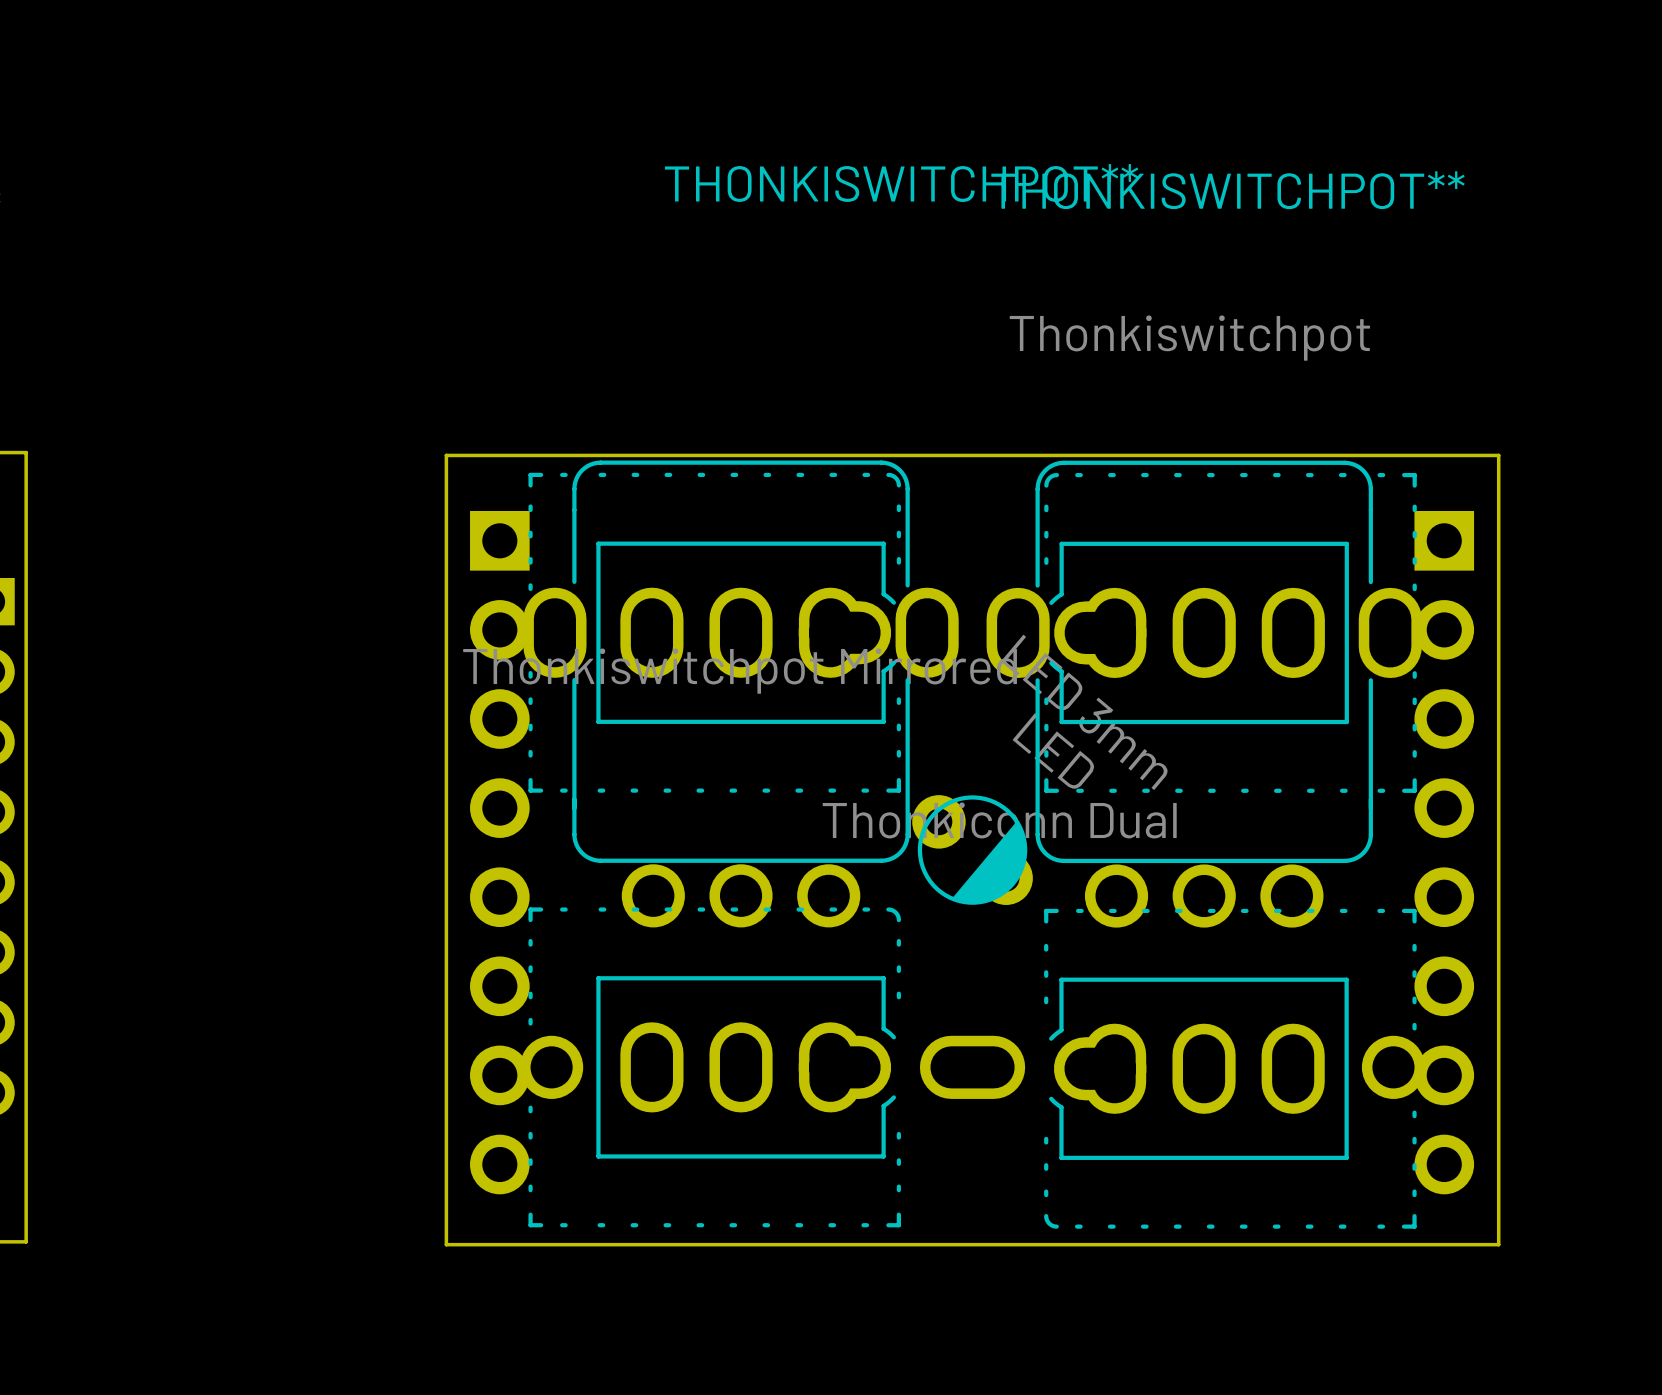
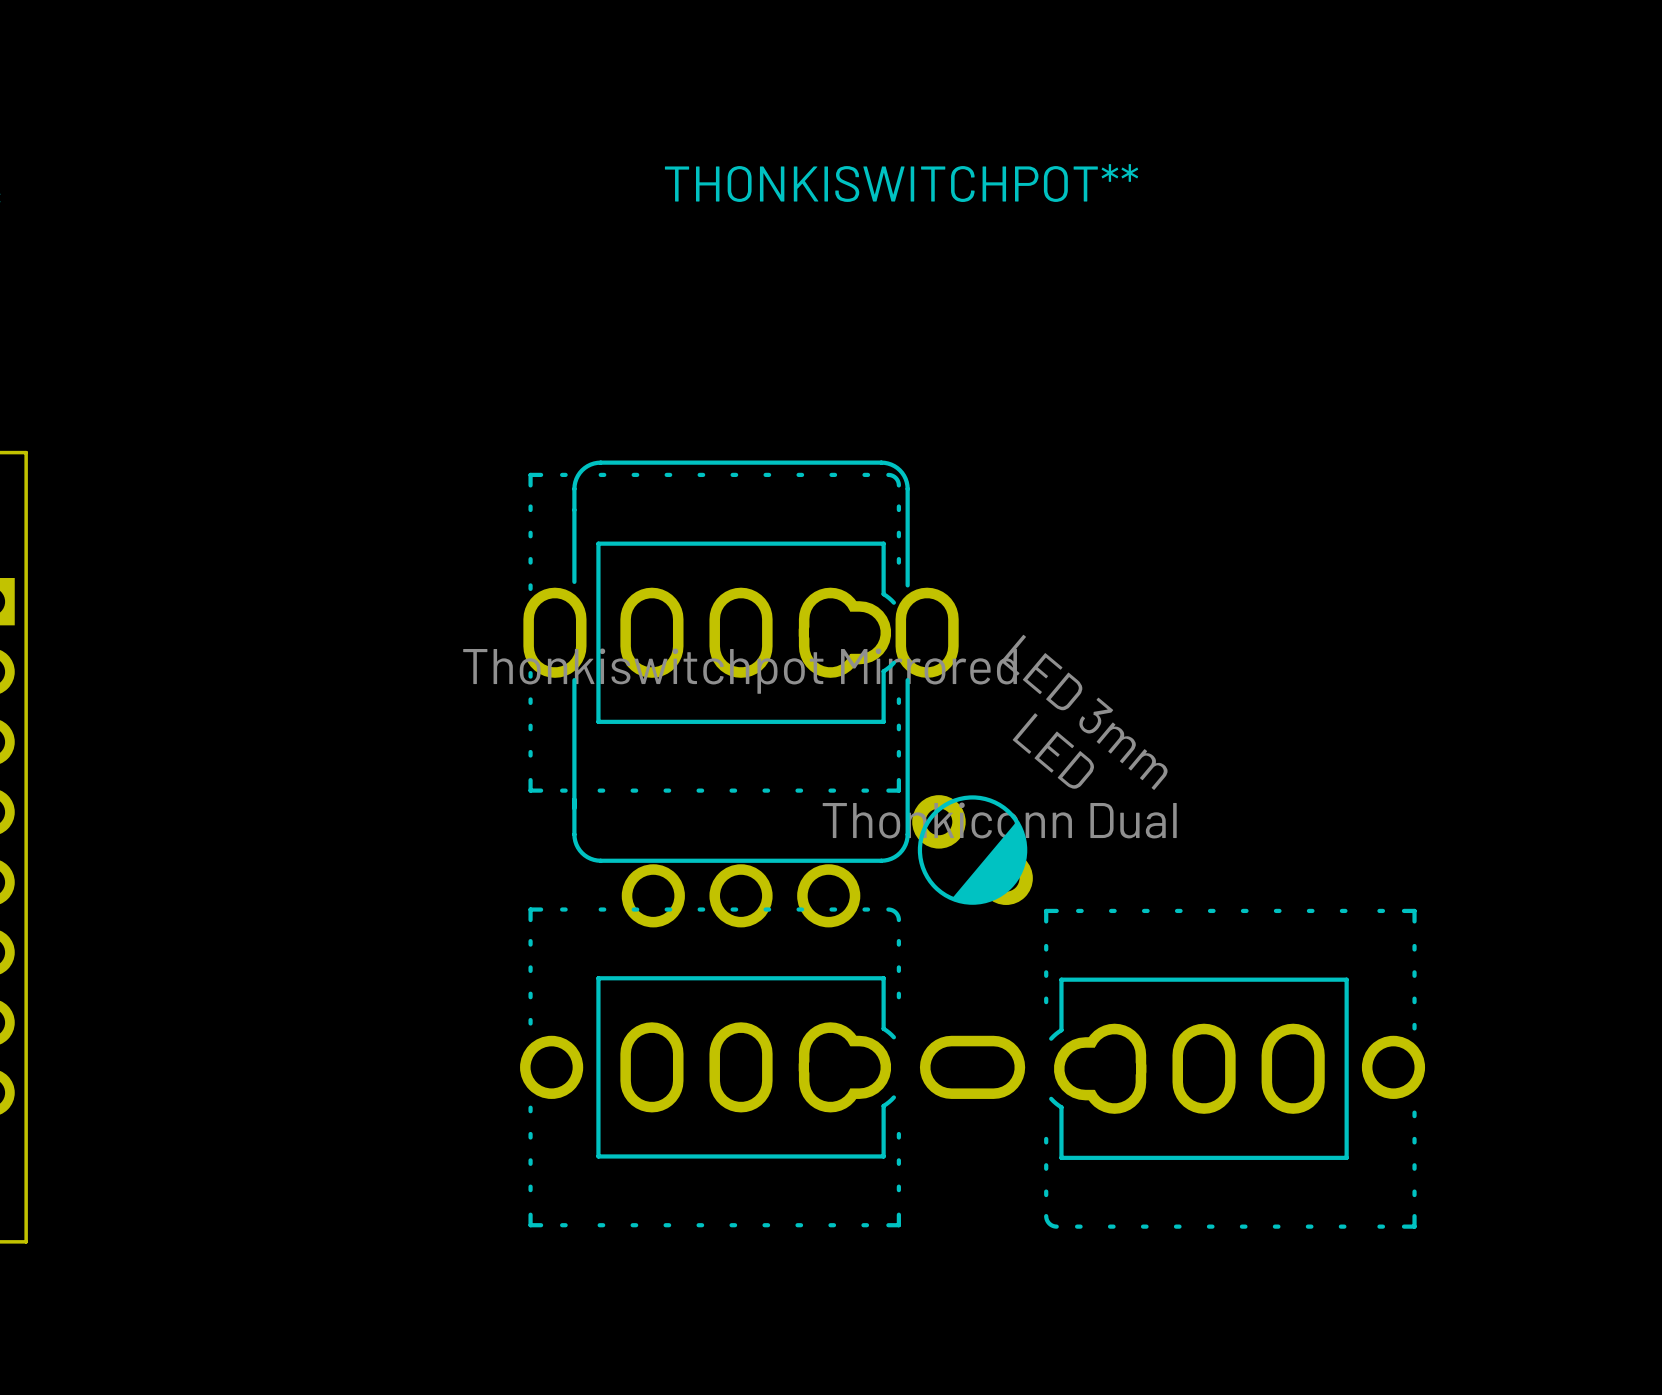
board edge: (446, 455) (1498, 455) (1498, 1244) (446, 1244) (446, 455) -> none
THONKISWITCHPOT**: Thonkiswitchpot (1204, 694) -> none
part: (499, 852) -> none
part: (1444, 852) -> none

